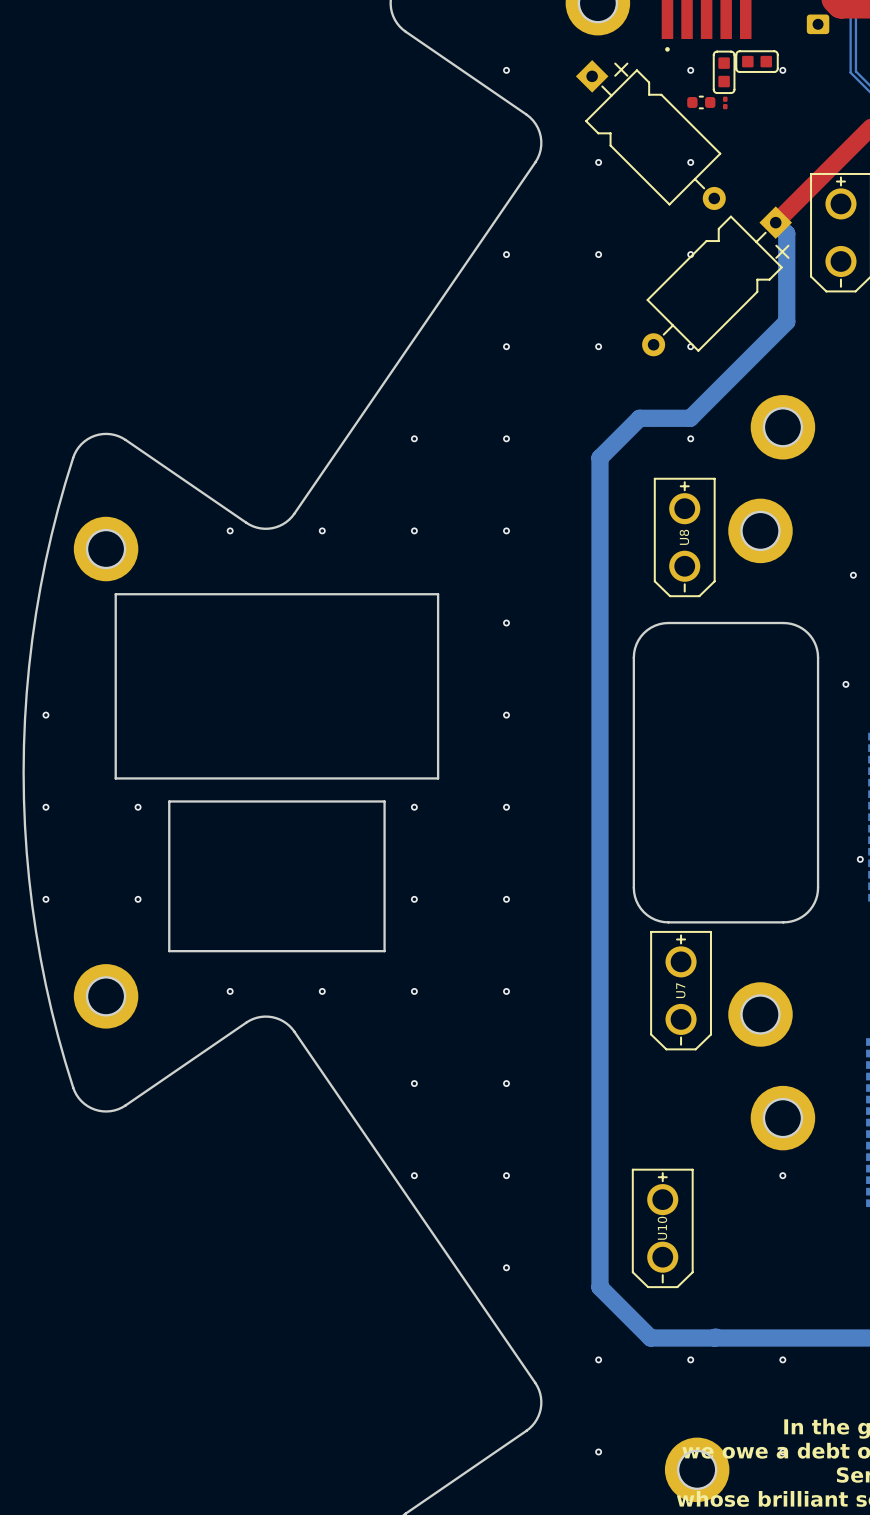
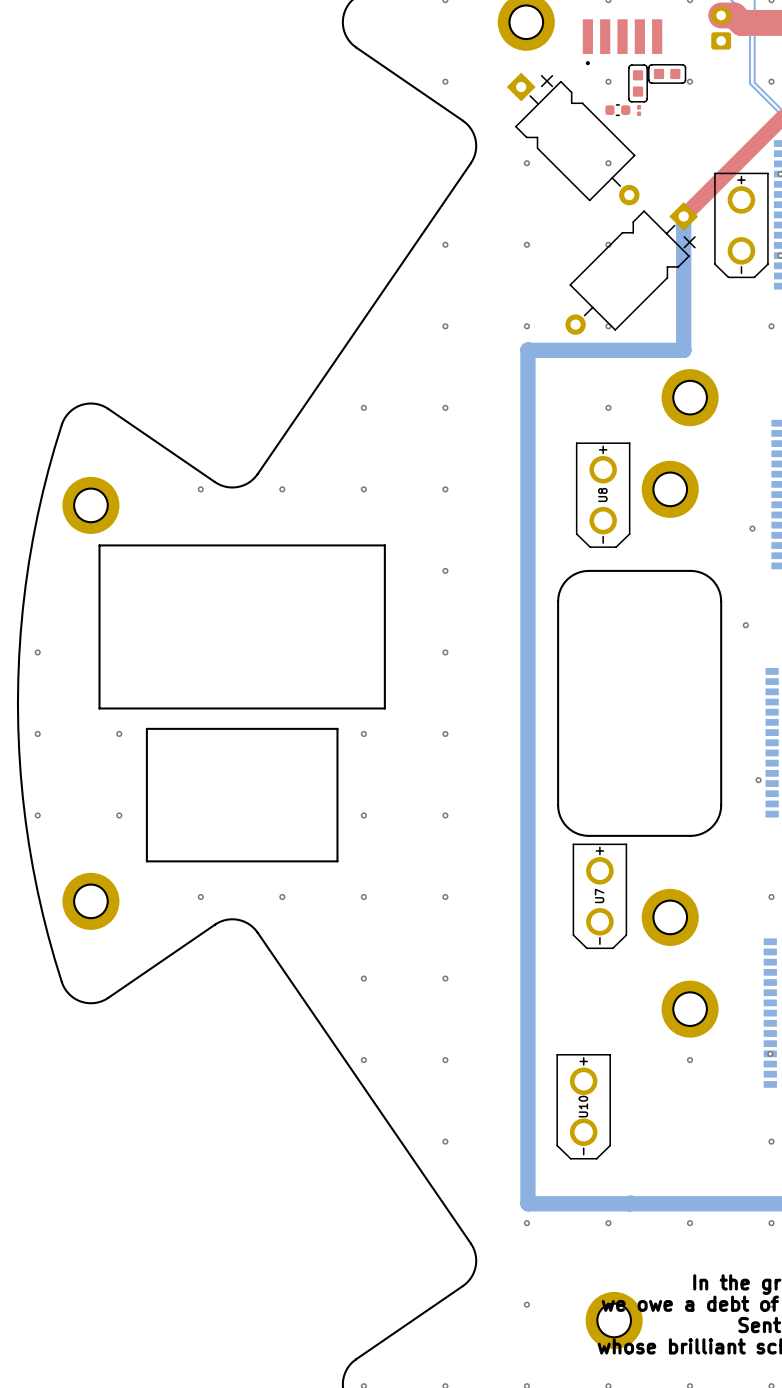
bottom track: (775, 222) (786, 233) (786, 321) (690, 418) (639, 418) (599, 457) (599, 1287) (650, 1338) -> (683, 350) (527, 350) (527, 1203) (572, 1203)
bottom track: none -> (683, 216) (683, 350)

